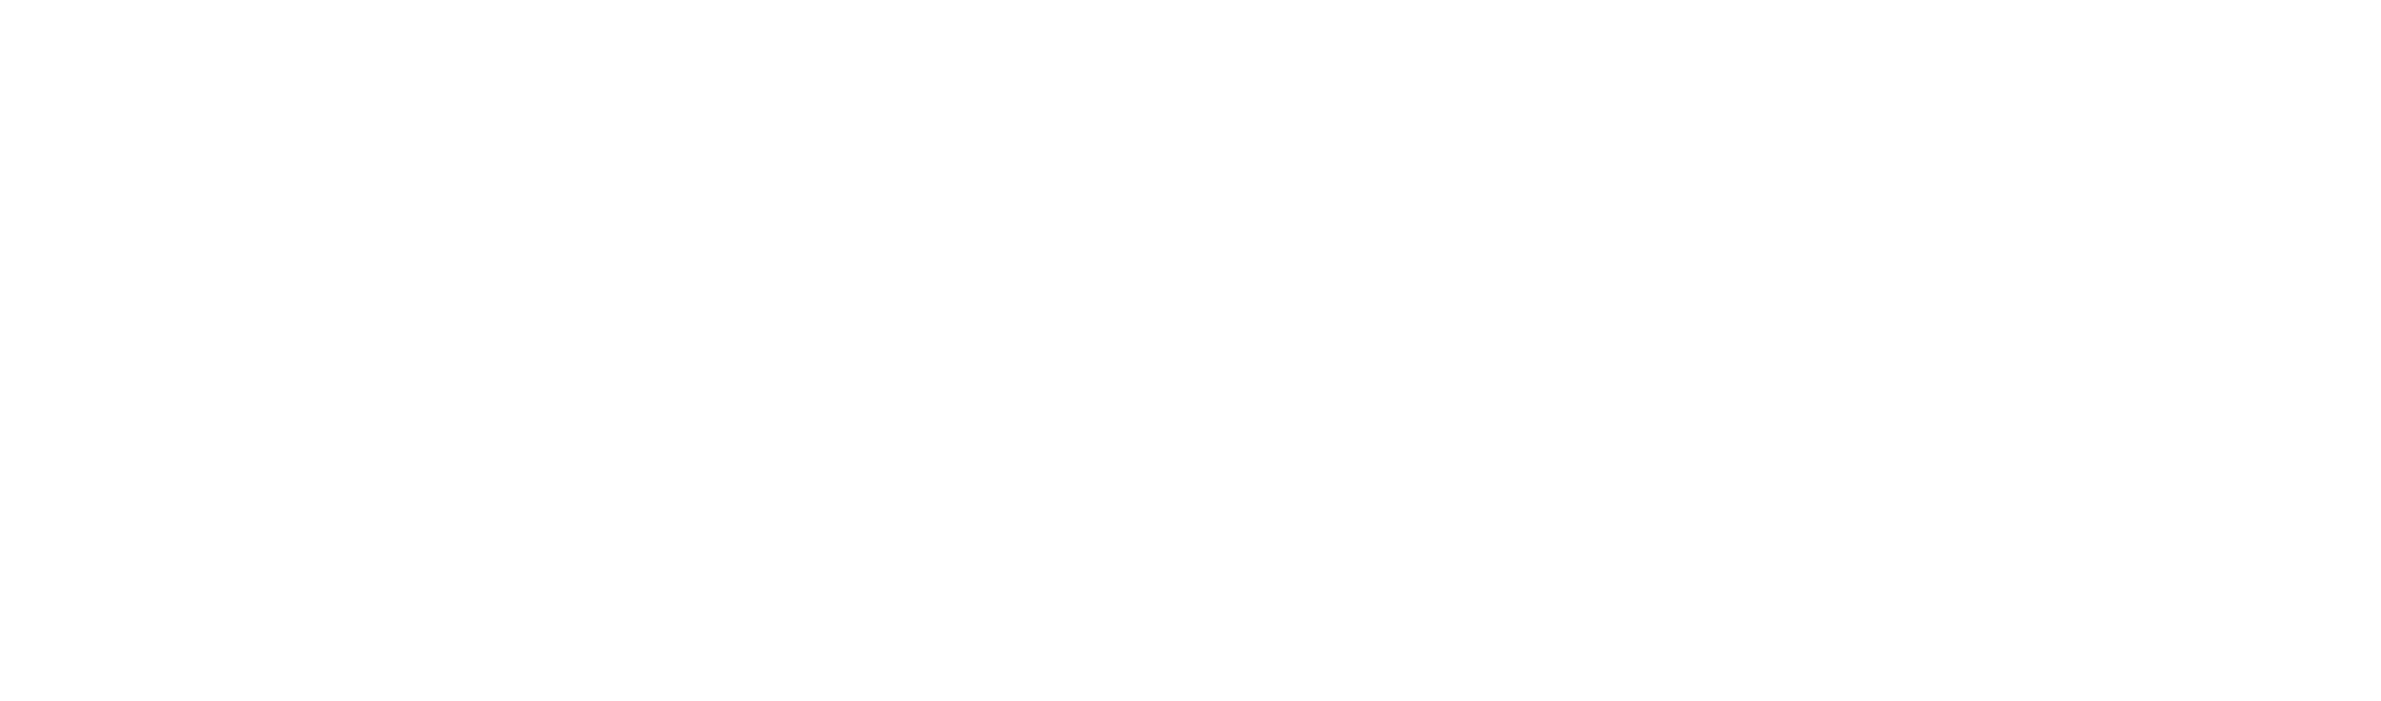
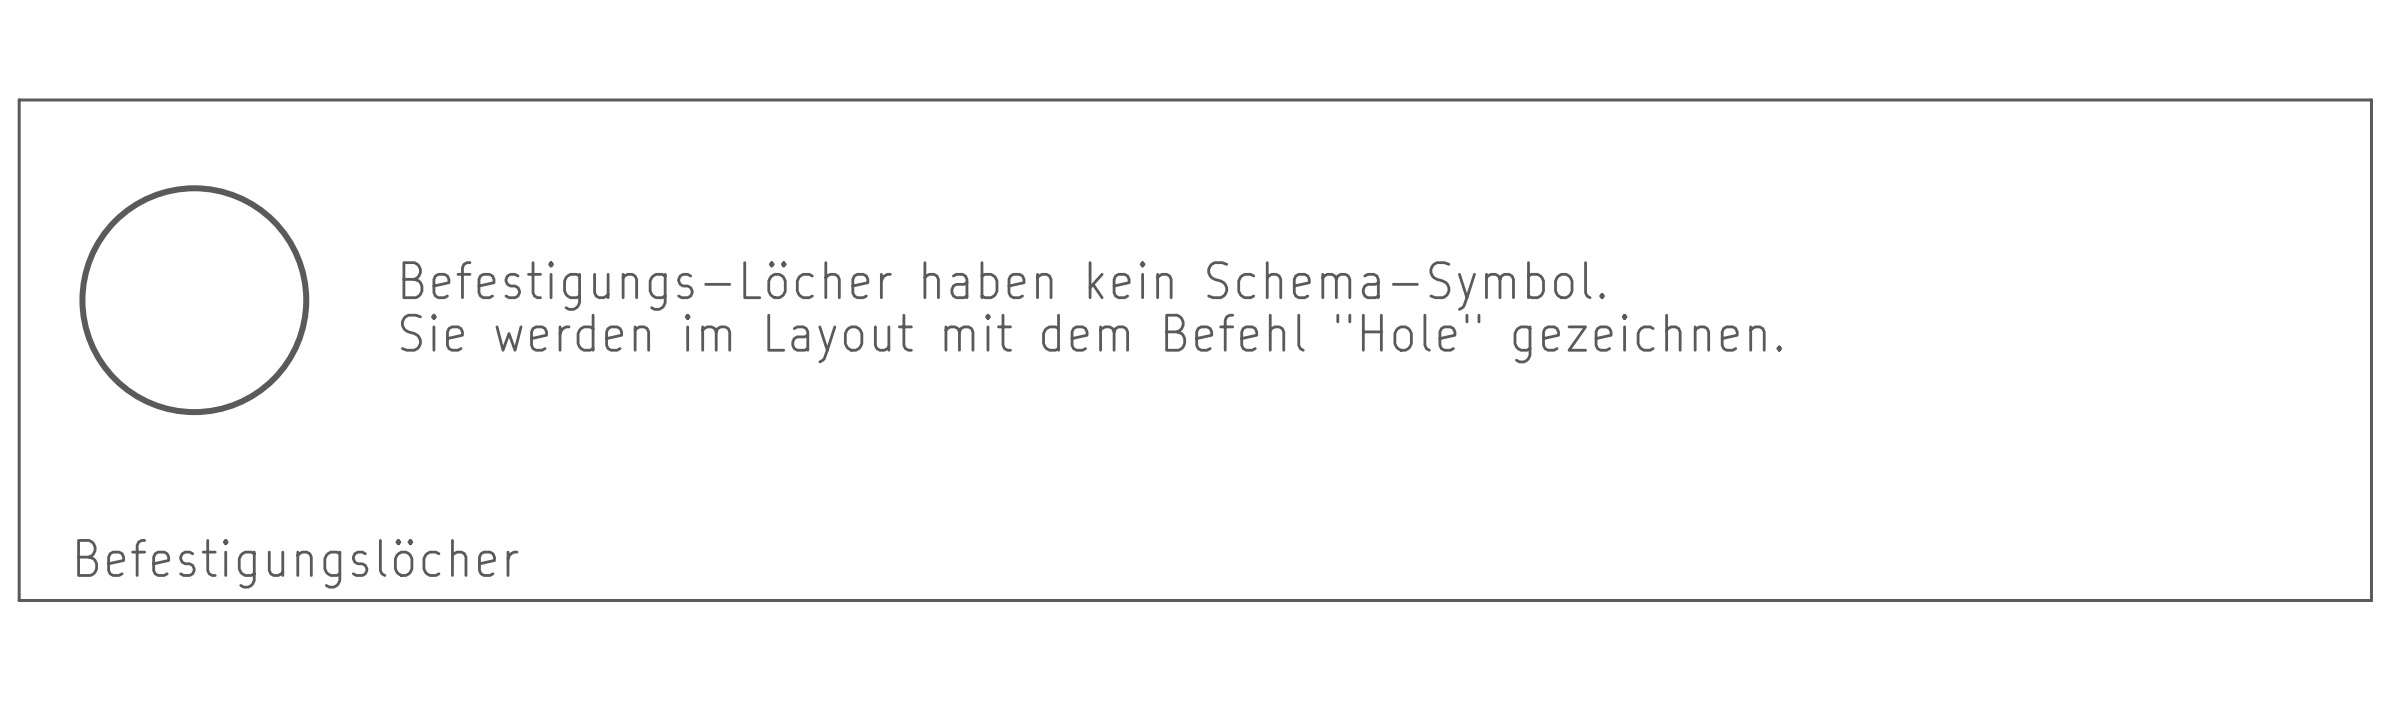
line: none -> (19, 100) (19, 600) (2371, 600) (2371, 100) (19, 100)
drawing: none -> [79, 185, 310, 416]
text: none -> Befestigungs-Löcher haben kein Schema-Symbol. (1003, 286)
text: none -> Sie werden im Layout mit dem Befehl "Hole" gezeichnen. (1091, 338)
text: none -> Befestigungslöcher (297, 563)

